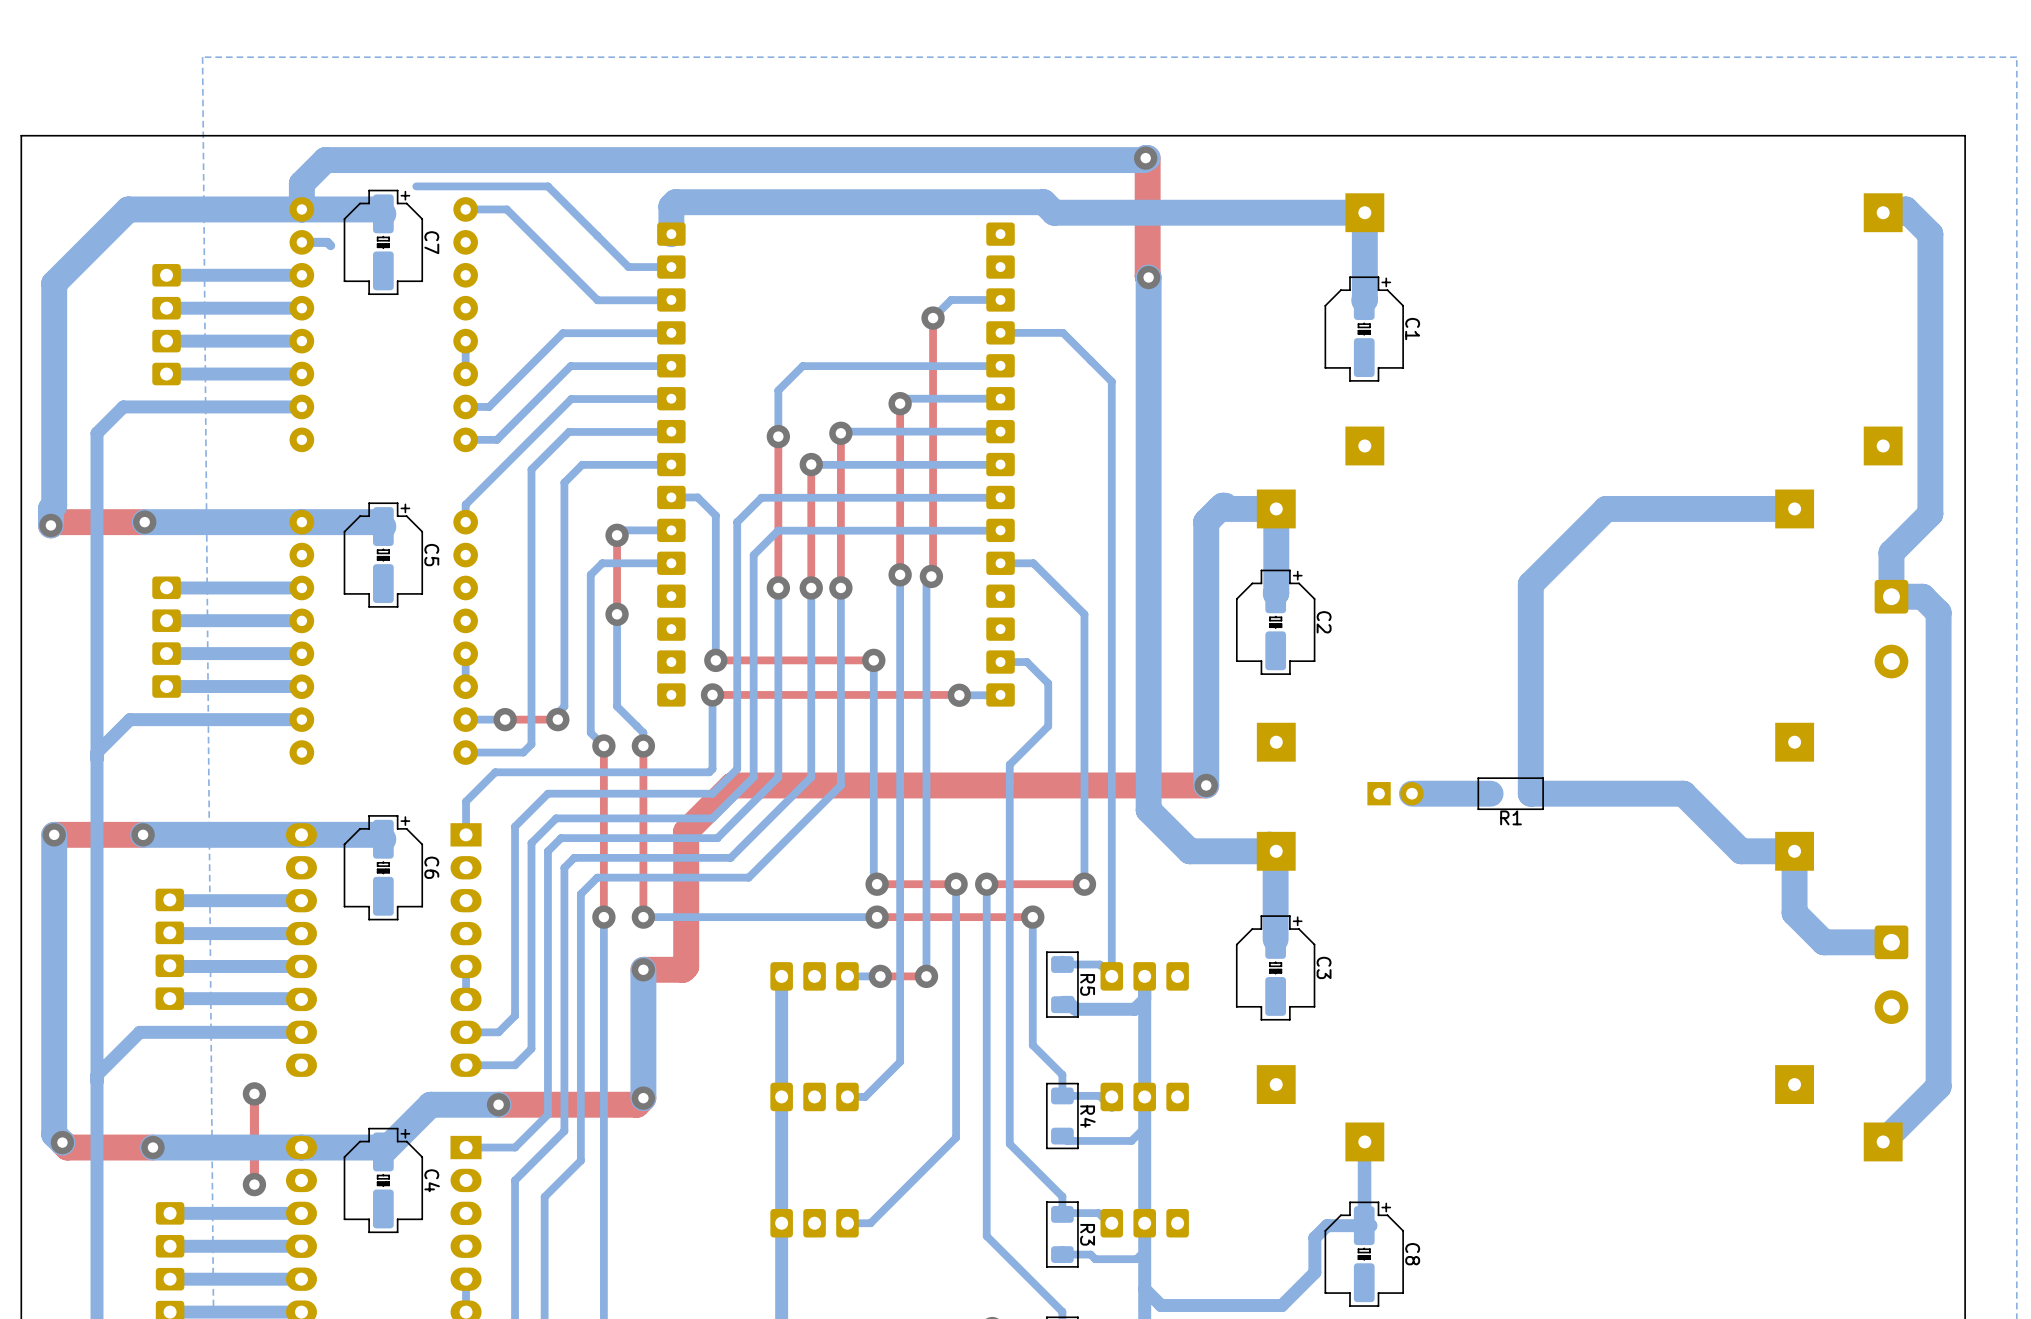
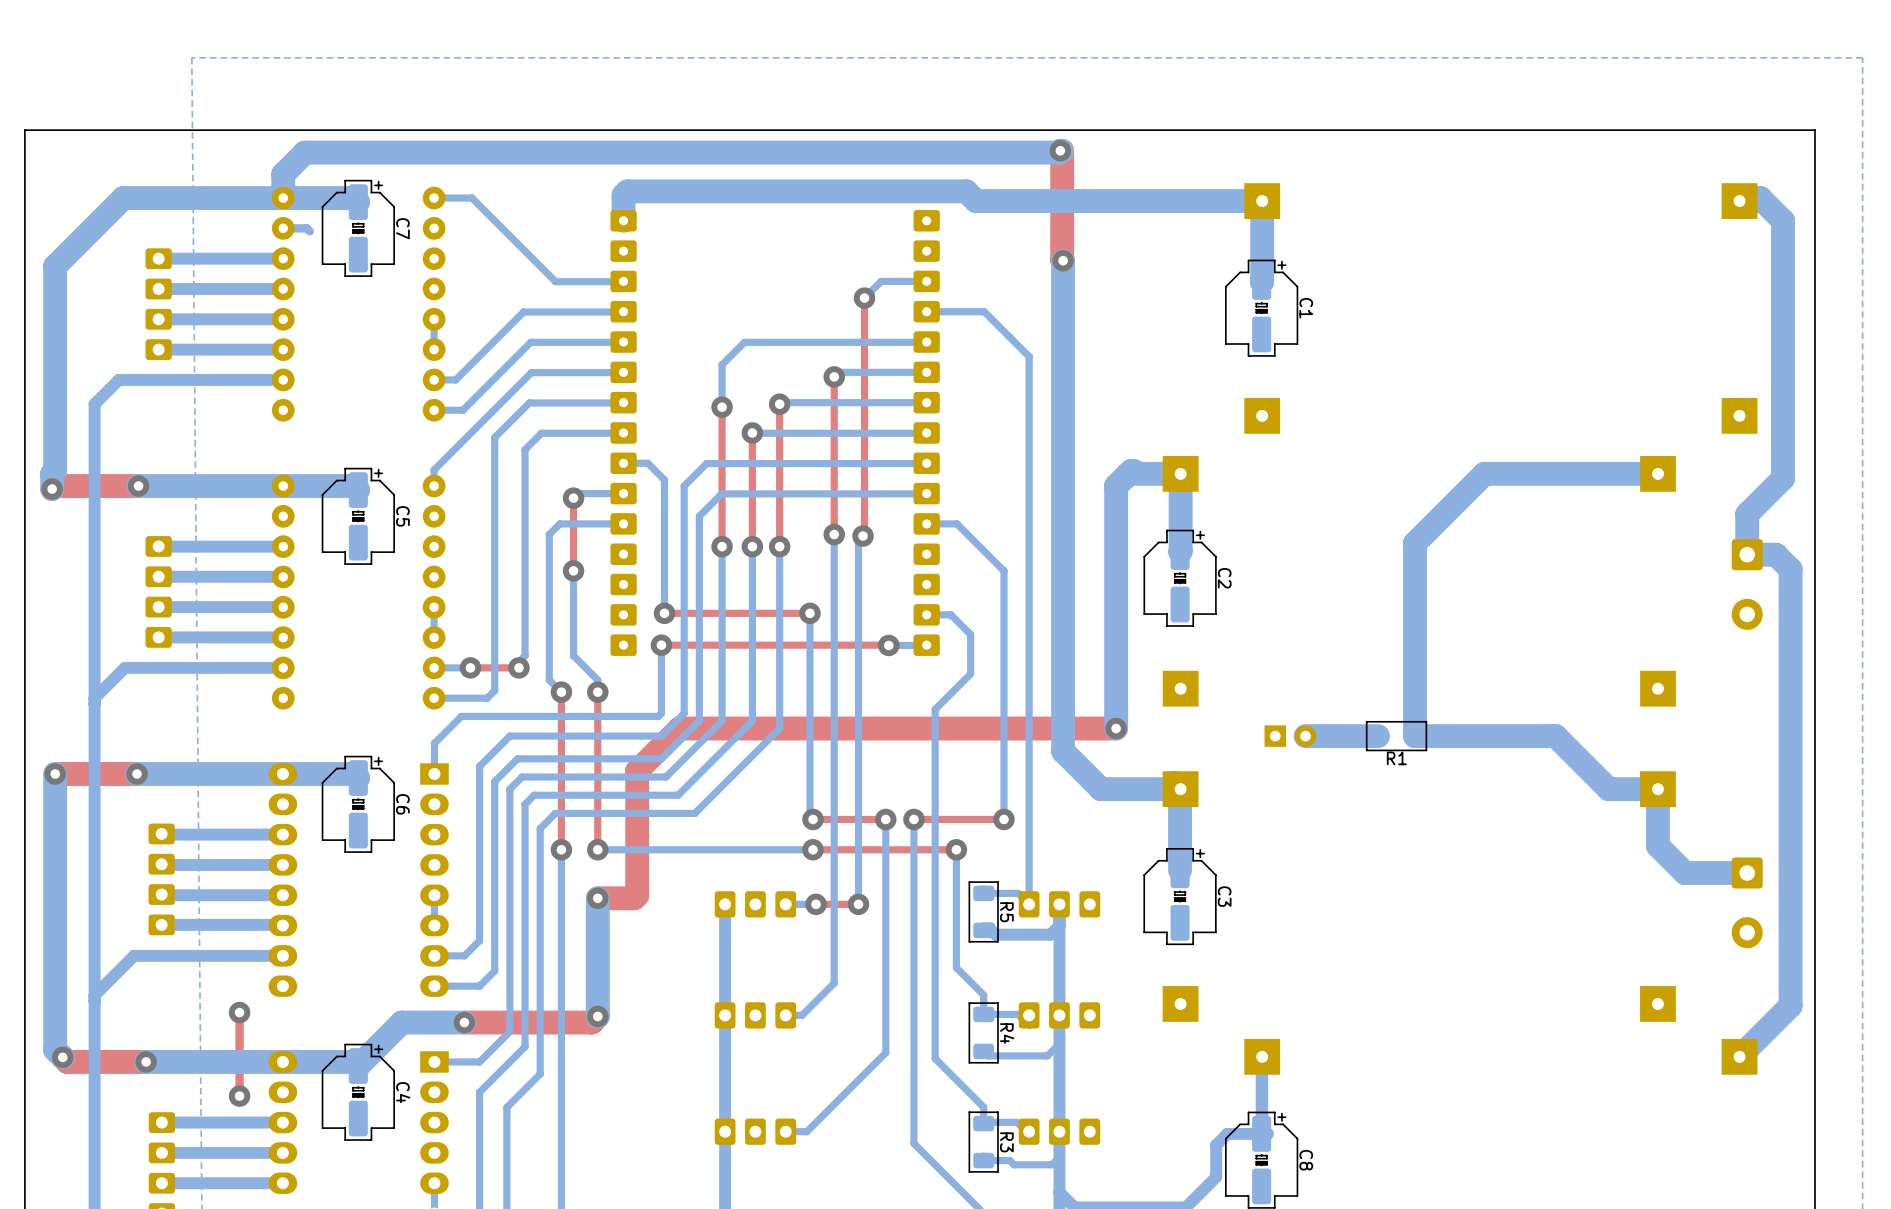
bottom track: (416, 186) (547, 186) (628, 267) (671, 267) -> none

